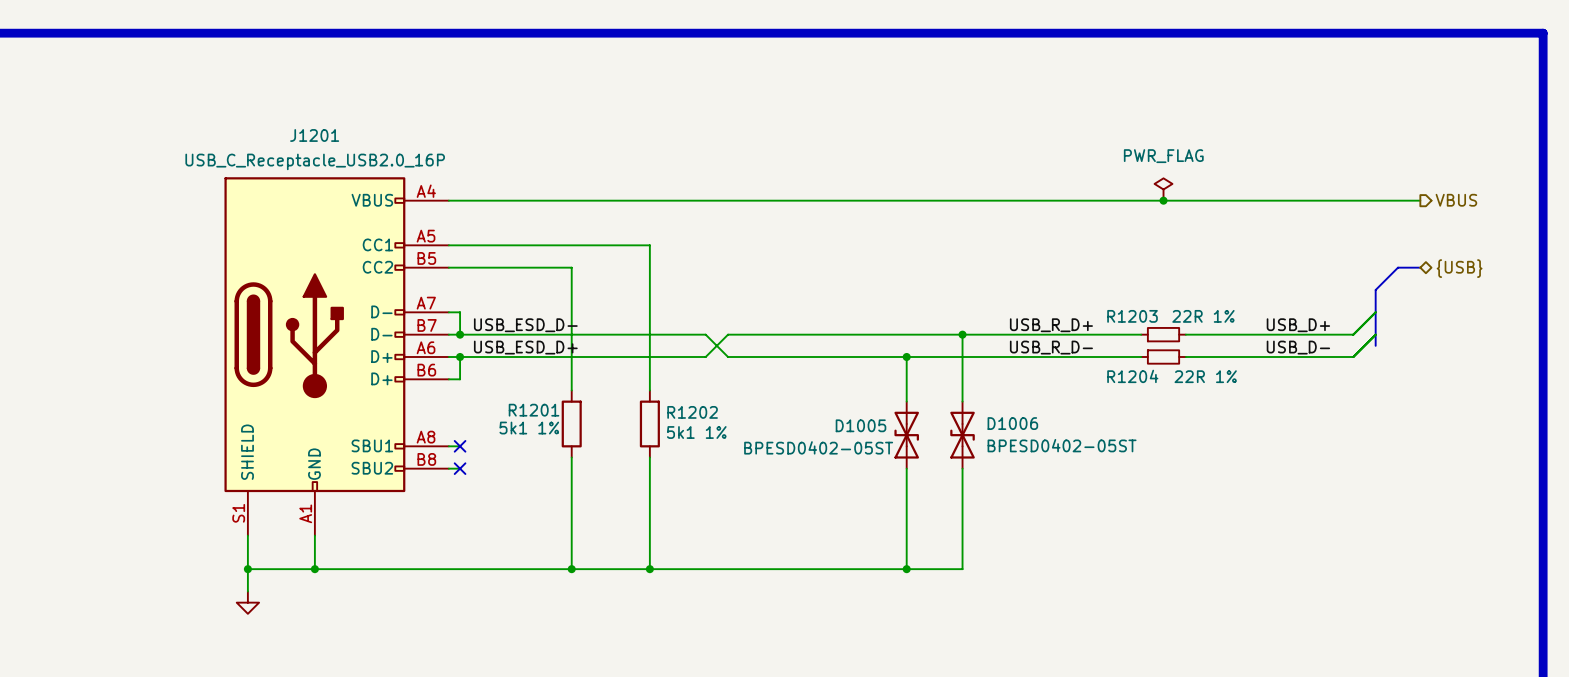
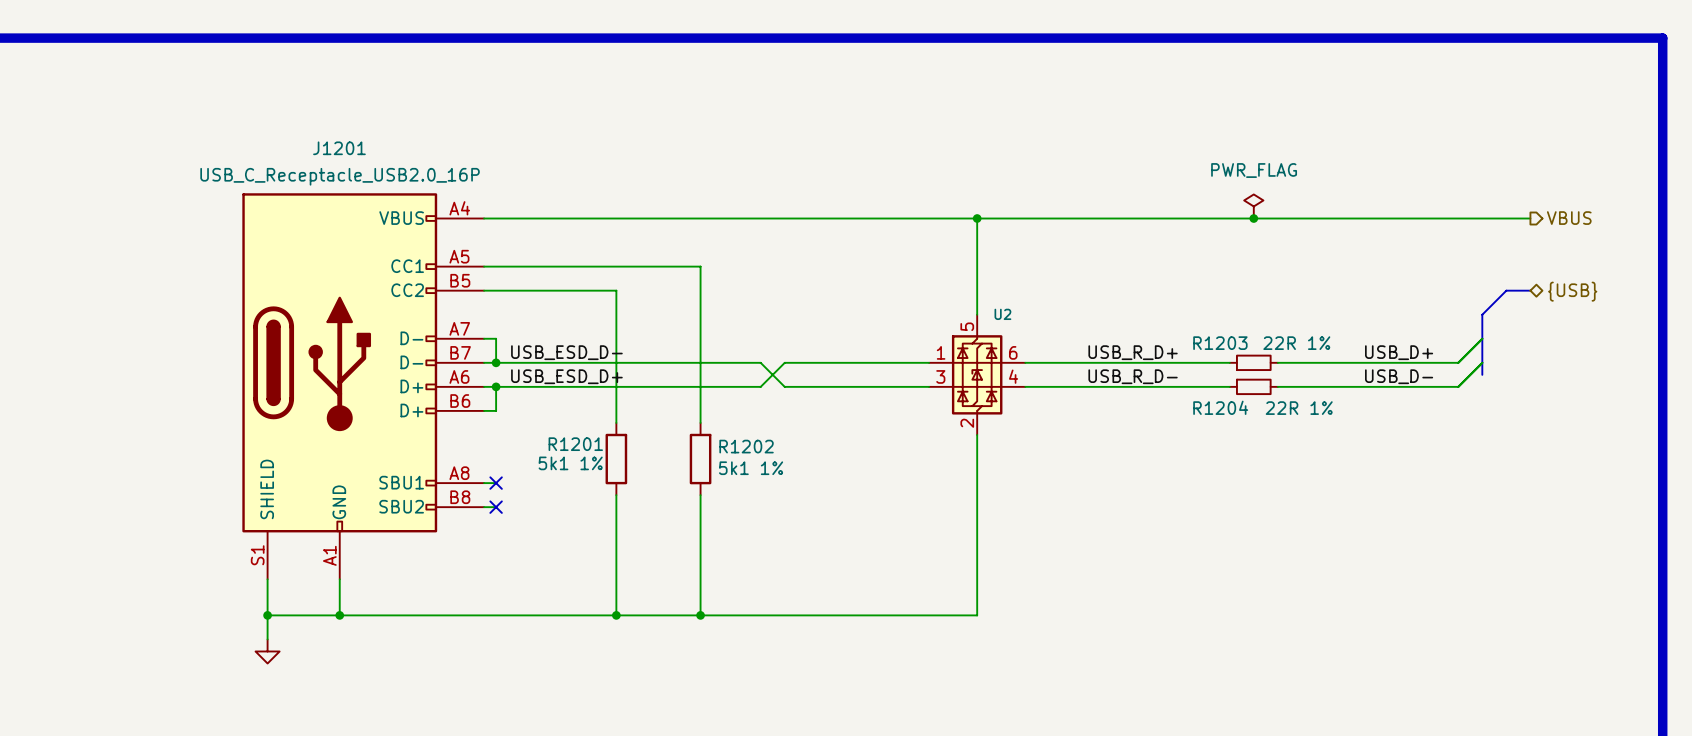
wire: none -> (977, 218) (977, 314)
junction: none -> (977, 218)
wire: (962, 334) (962, 401) -> none
junction: (962, 334) -> none
U2: none -> (977, 374)
junction: (906, 356) -> none
D1005: BPESD0402-05ST (906, 435) -> none
D1006: BPESD0402-05ST (962, 435) -> none
wire: (962, 468) (962, 569) (906, 569) -> none
junction: (906, 569) -> none

